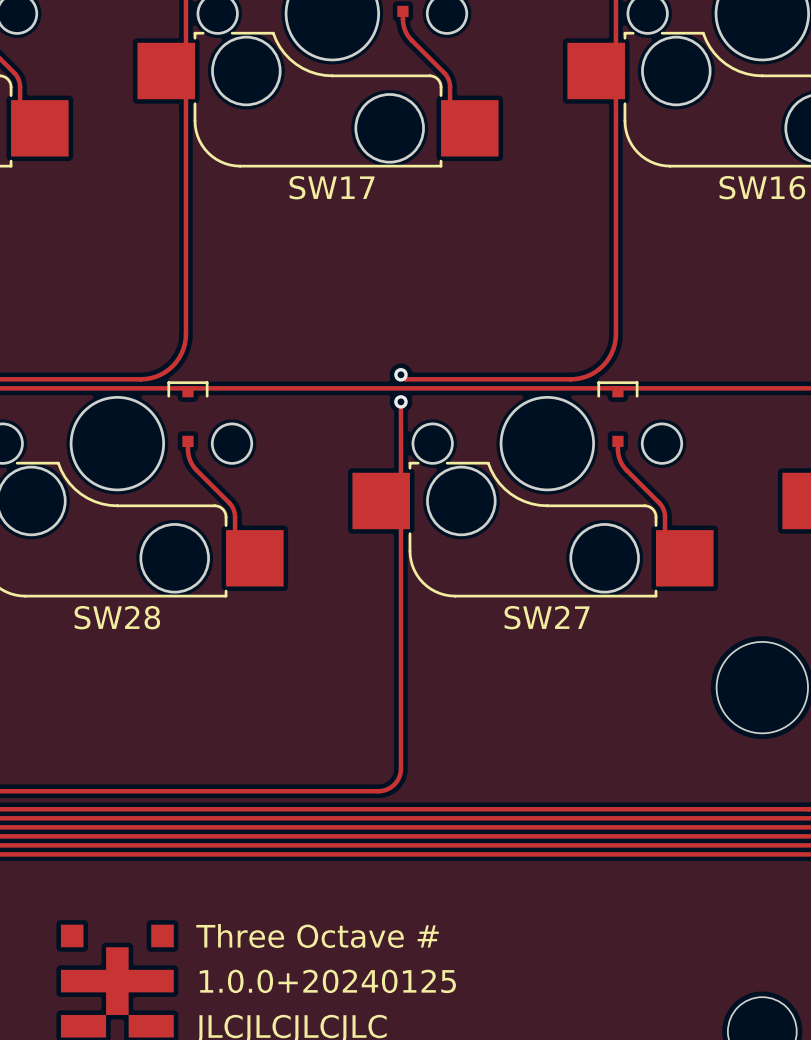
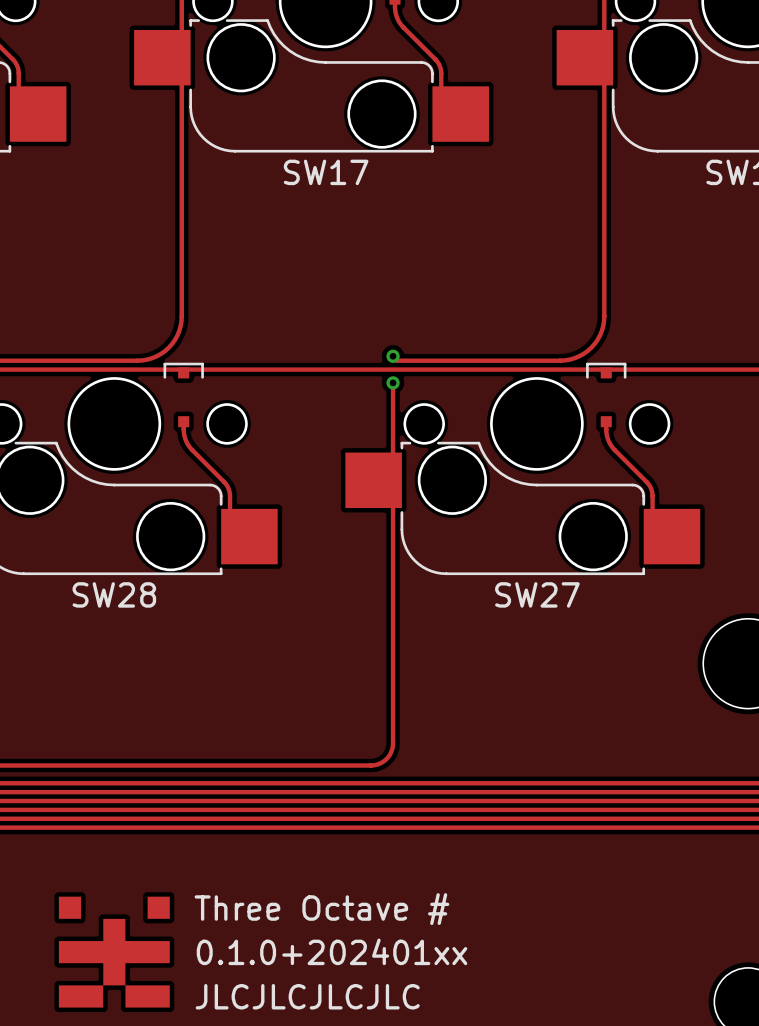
text: 1.0.0+20240125 (327, 981) -> 0.1.0+202401xx (332, 951)

